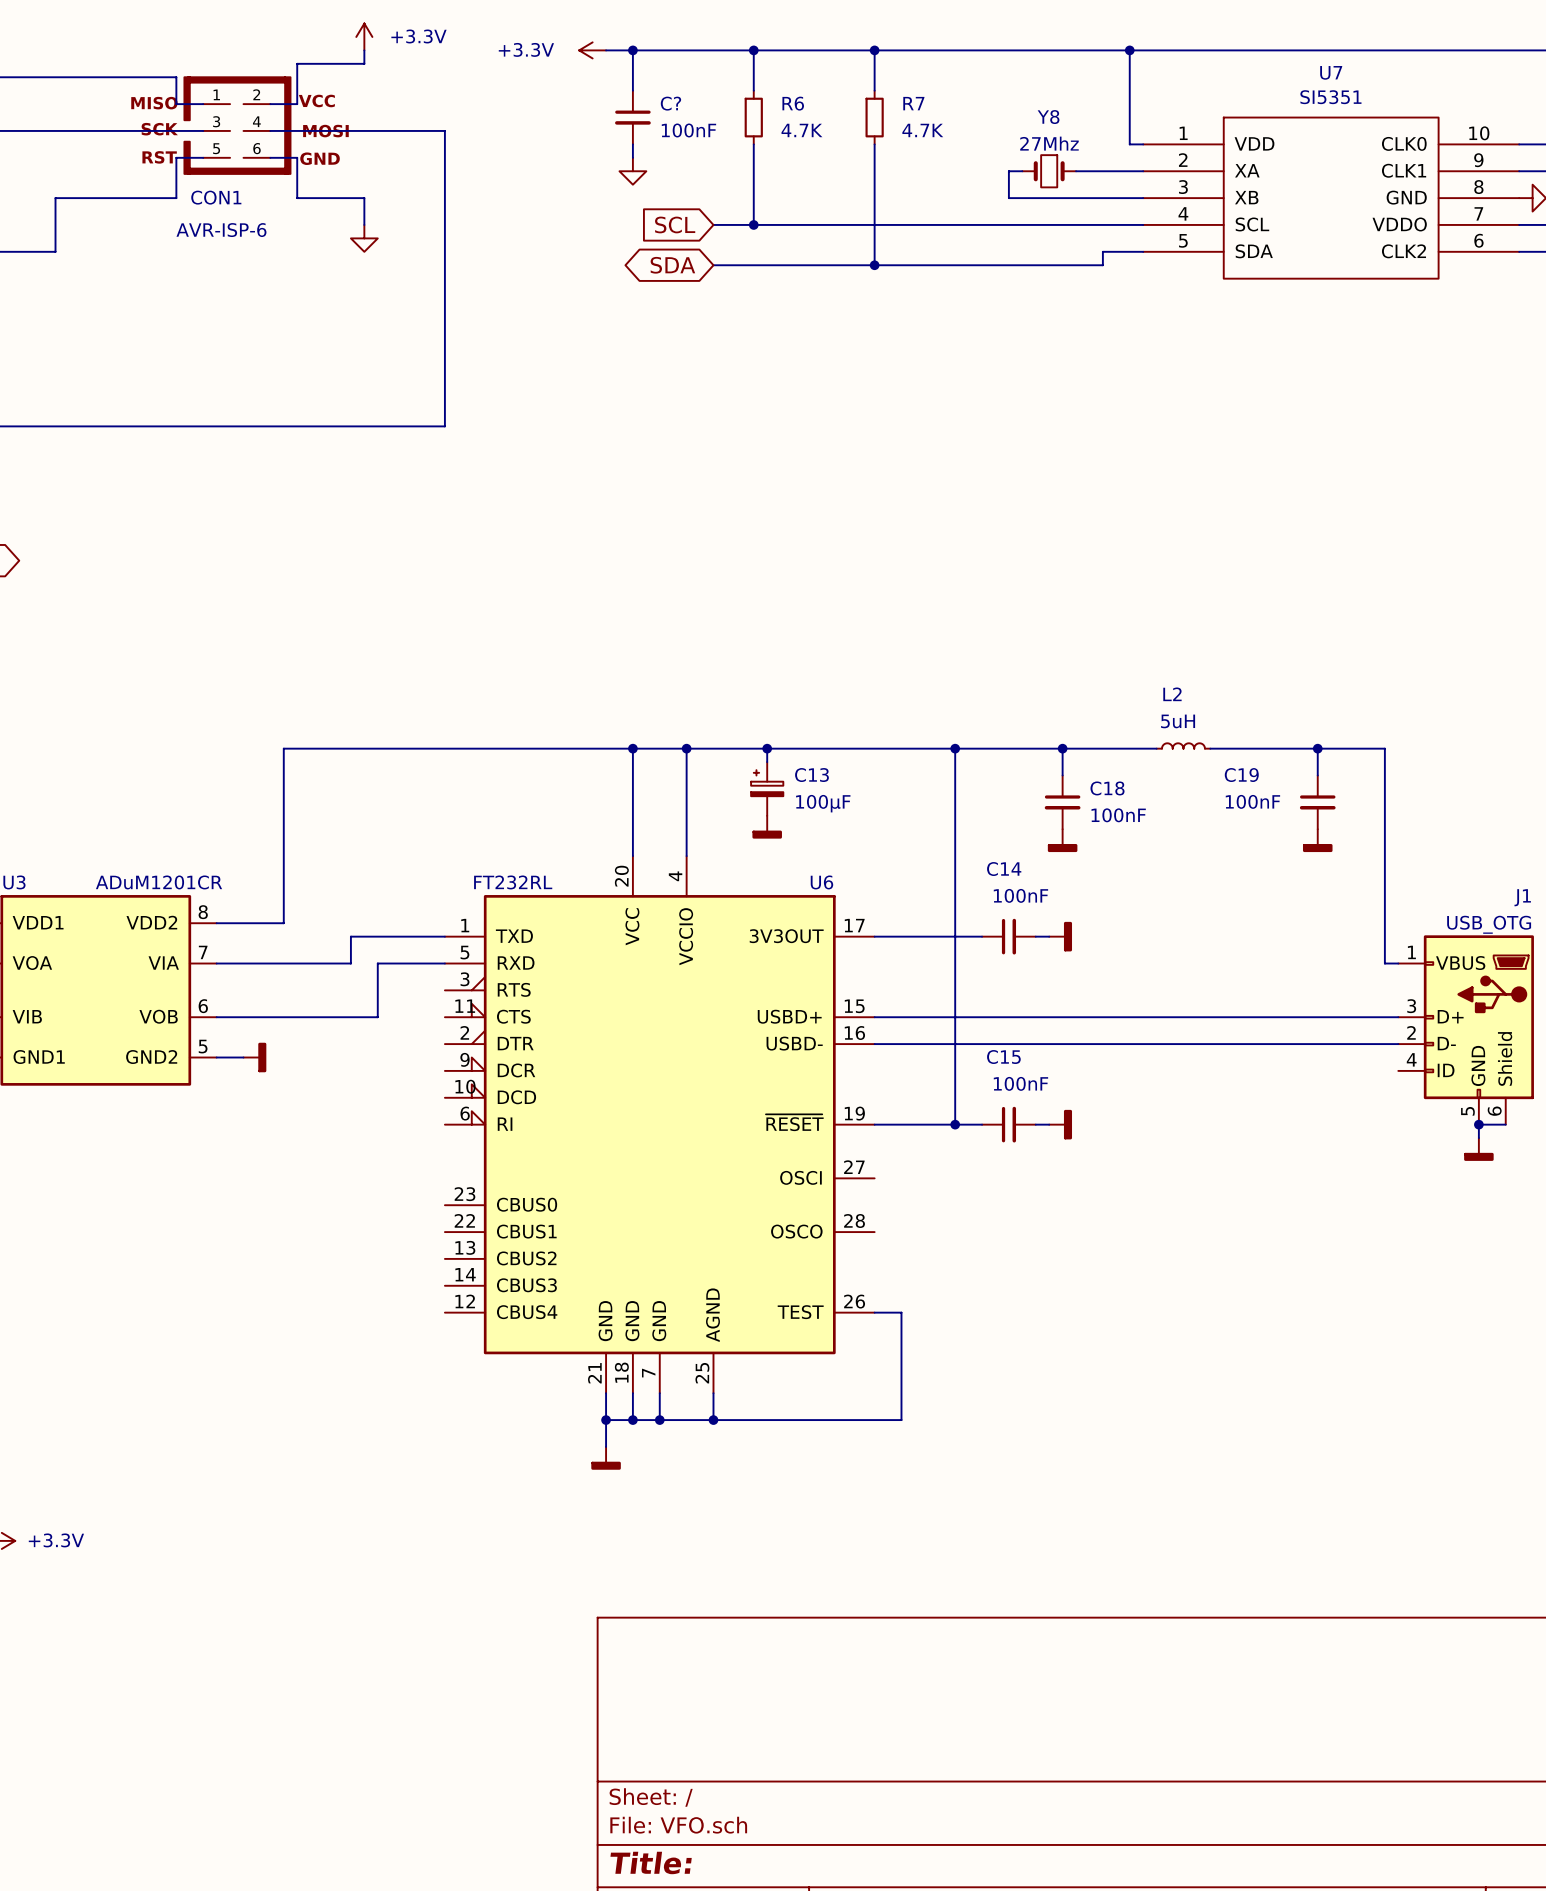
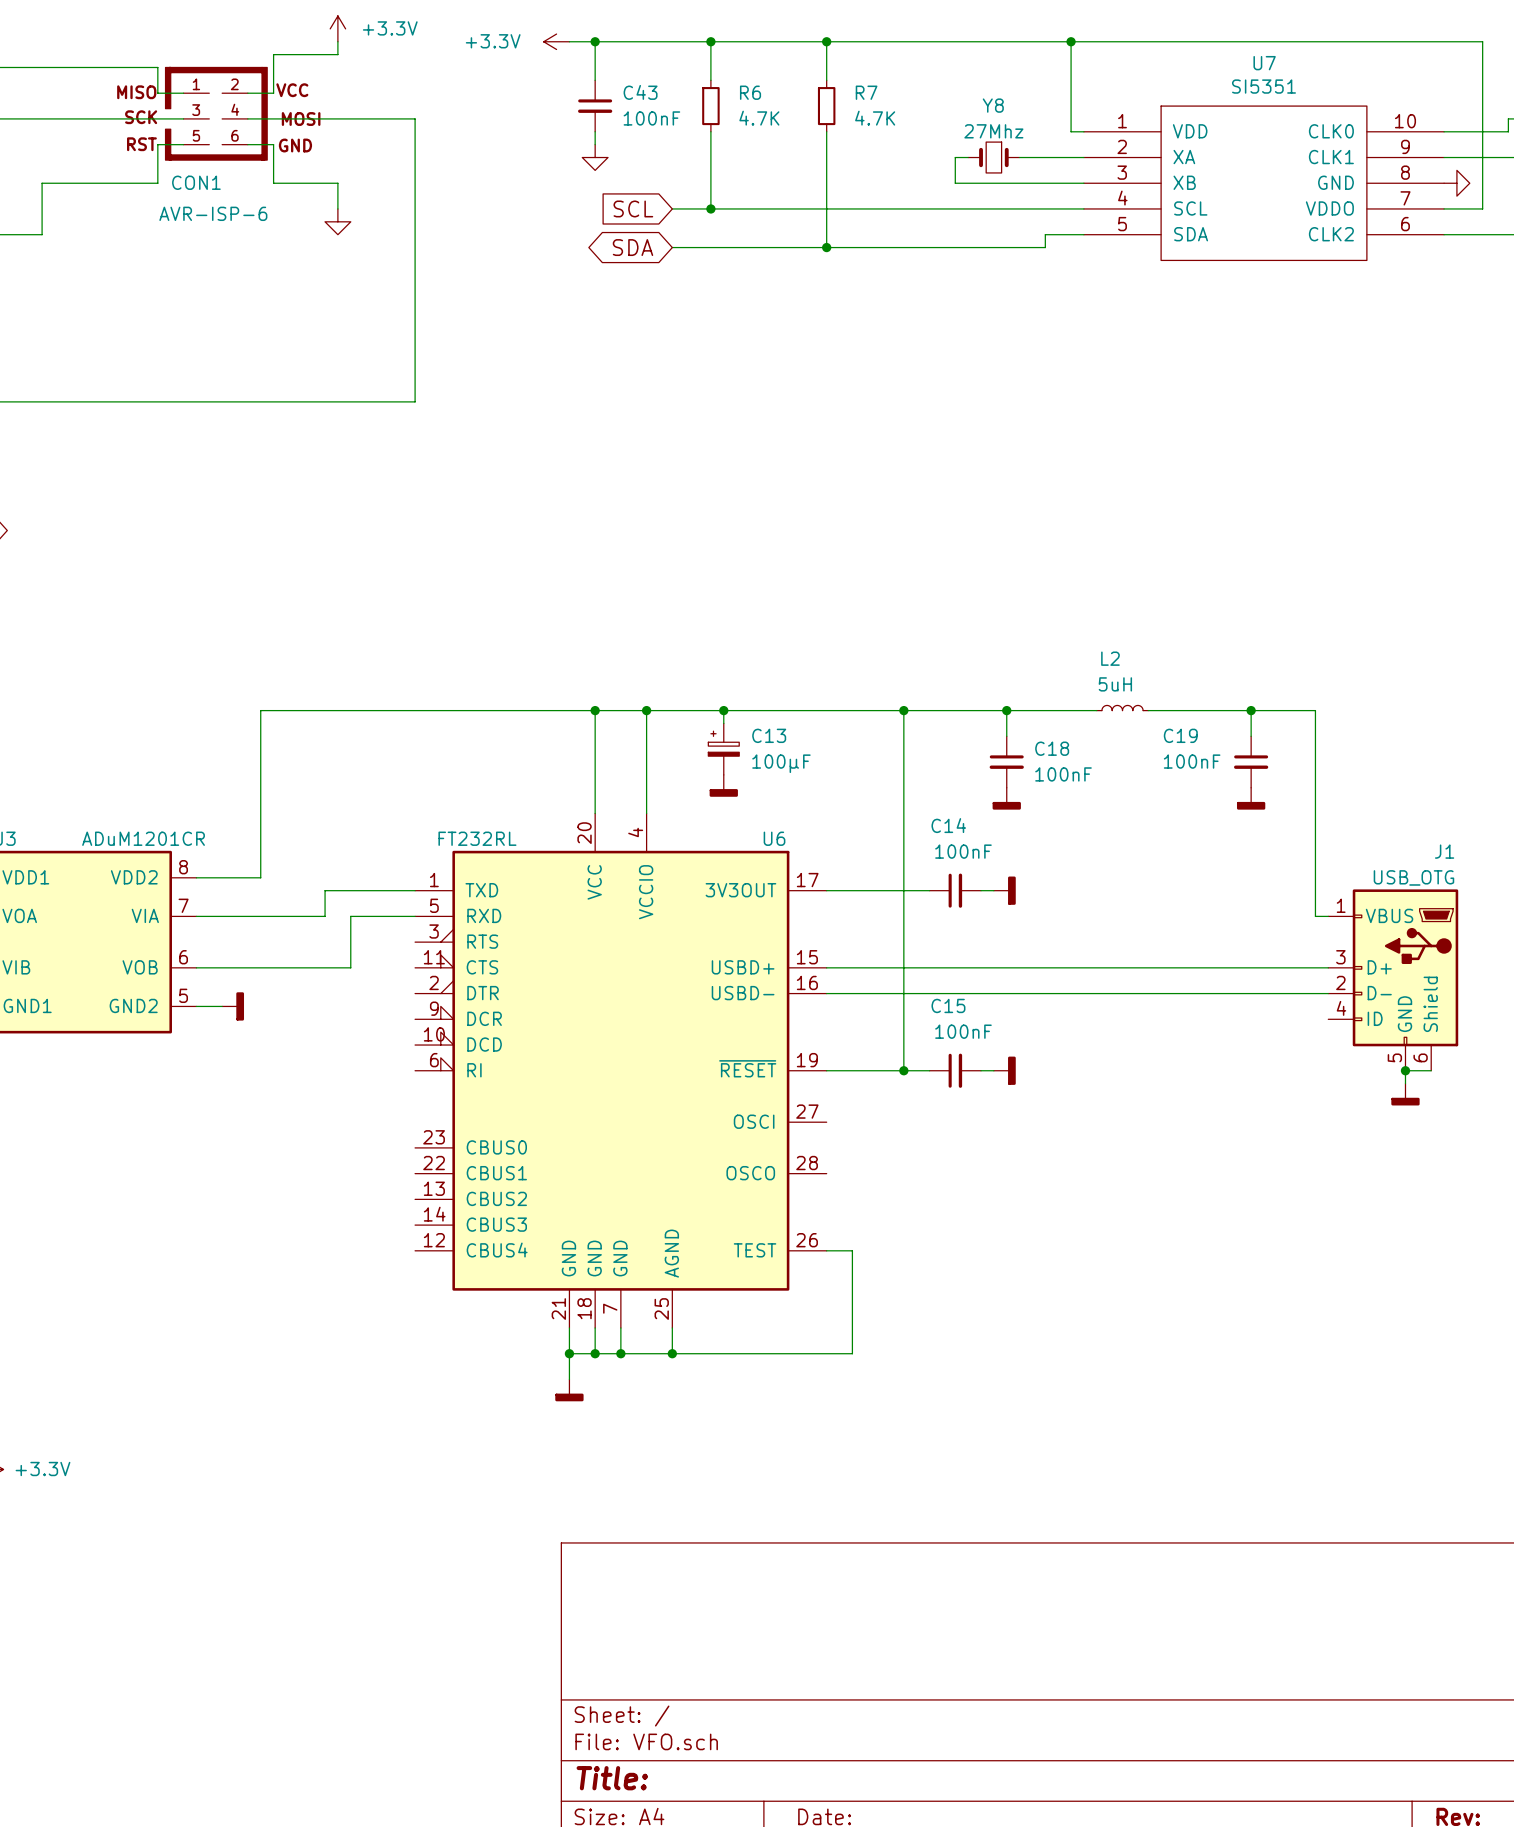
C? name: C? (670, 103) -> C43 (640, 92)

